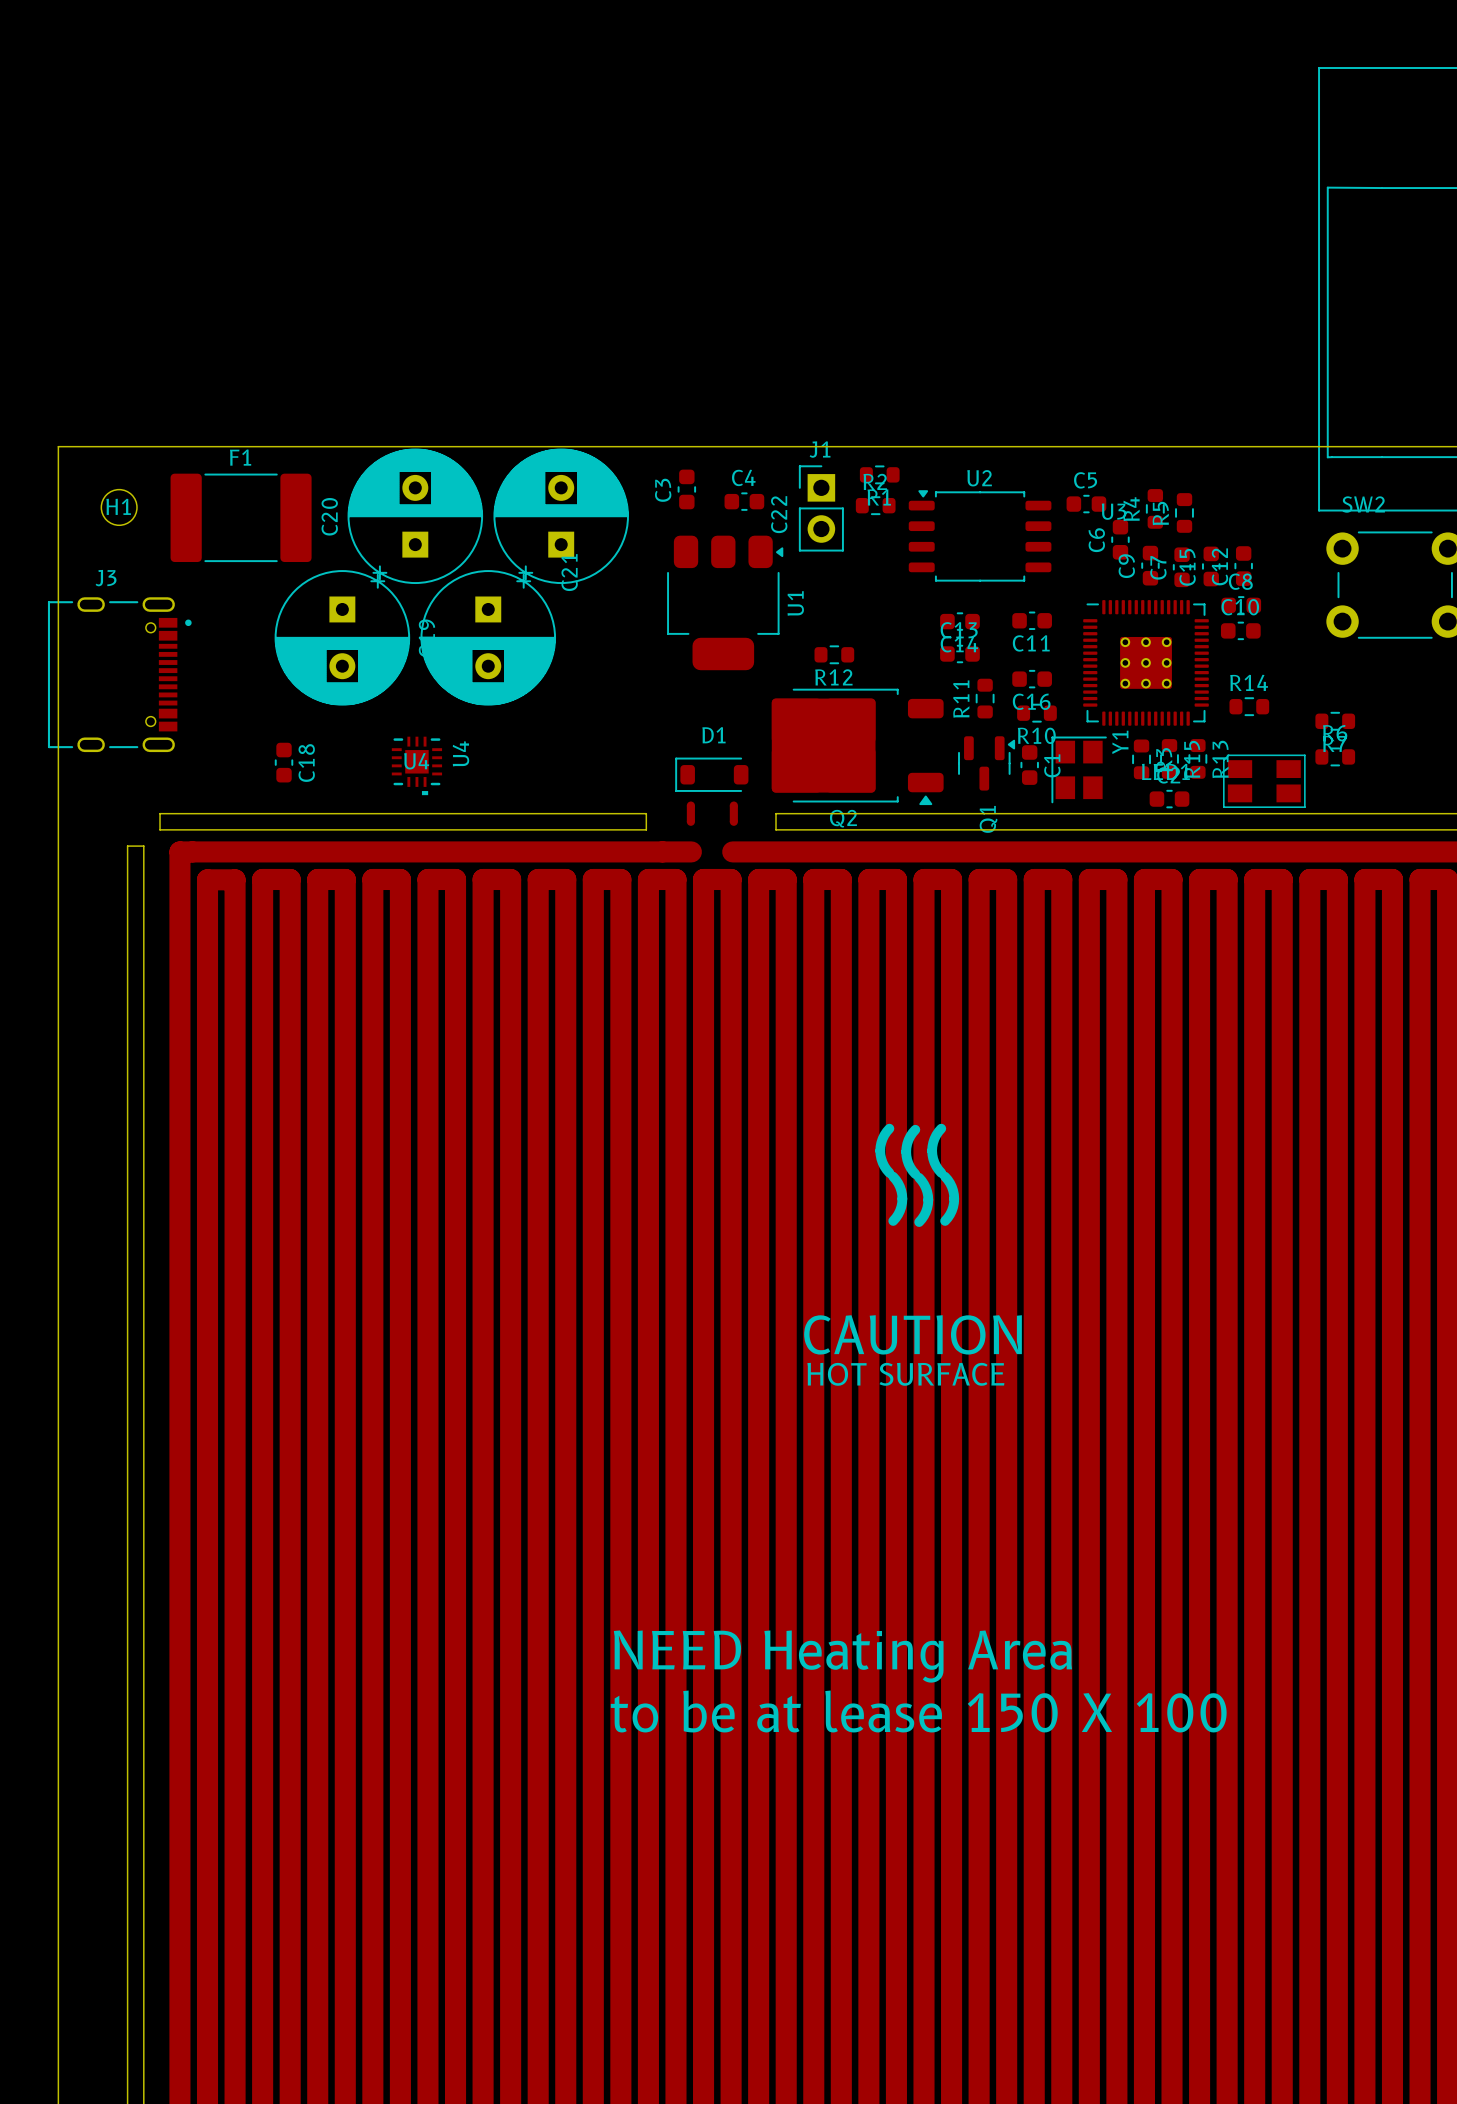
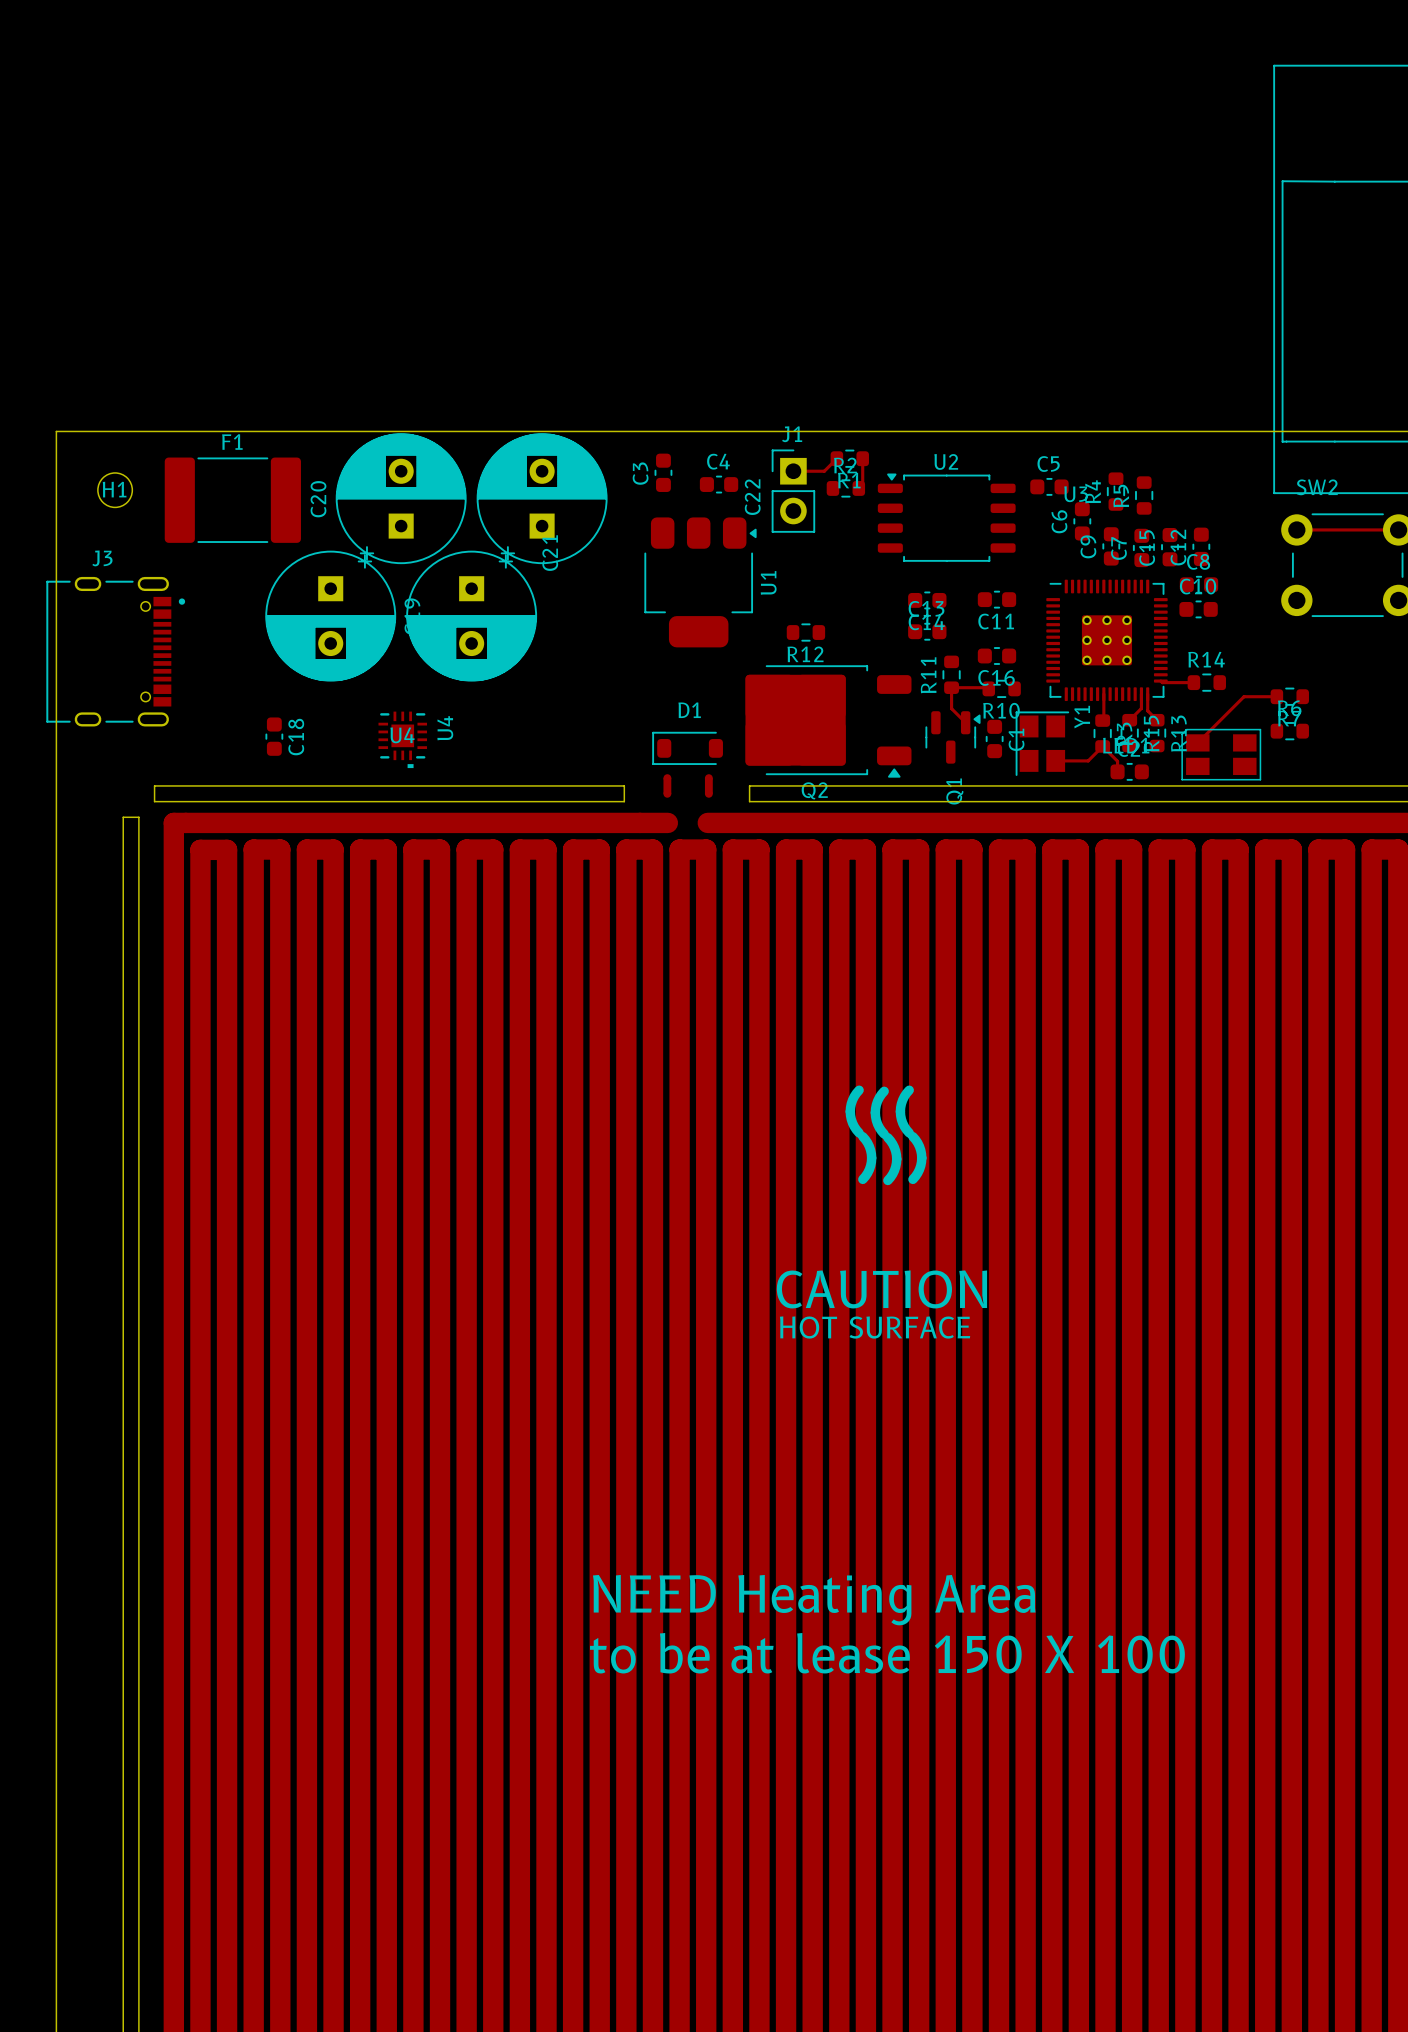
top track: none -> (836, 458) (824, 471) (793, 471)
top track: none -> (862, 458) (862, 486) (860, 488)
top track: none -> (1296, 529) (1398, 529)
top track: none -> (1160, 681) (1193, 682)
top track: none -> (988, 688) (951, 687) (951, 708) (965, 722)
top track: none -> (1103, 694) (1102, 720)
top track: none -> (1141, 694) (1141, 708) (1129, 720)
top track: none -> (1147, 694) (1147, 710) (1157, 720)
top track: none -> (1276, 696) (1243, 696) (1197, 742)
top track: none -> (1055, 760) (1088, 760) (1102, 746) (1117, 761) (1117, 771)

